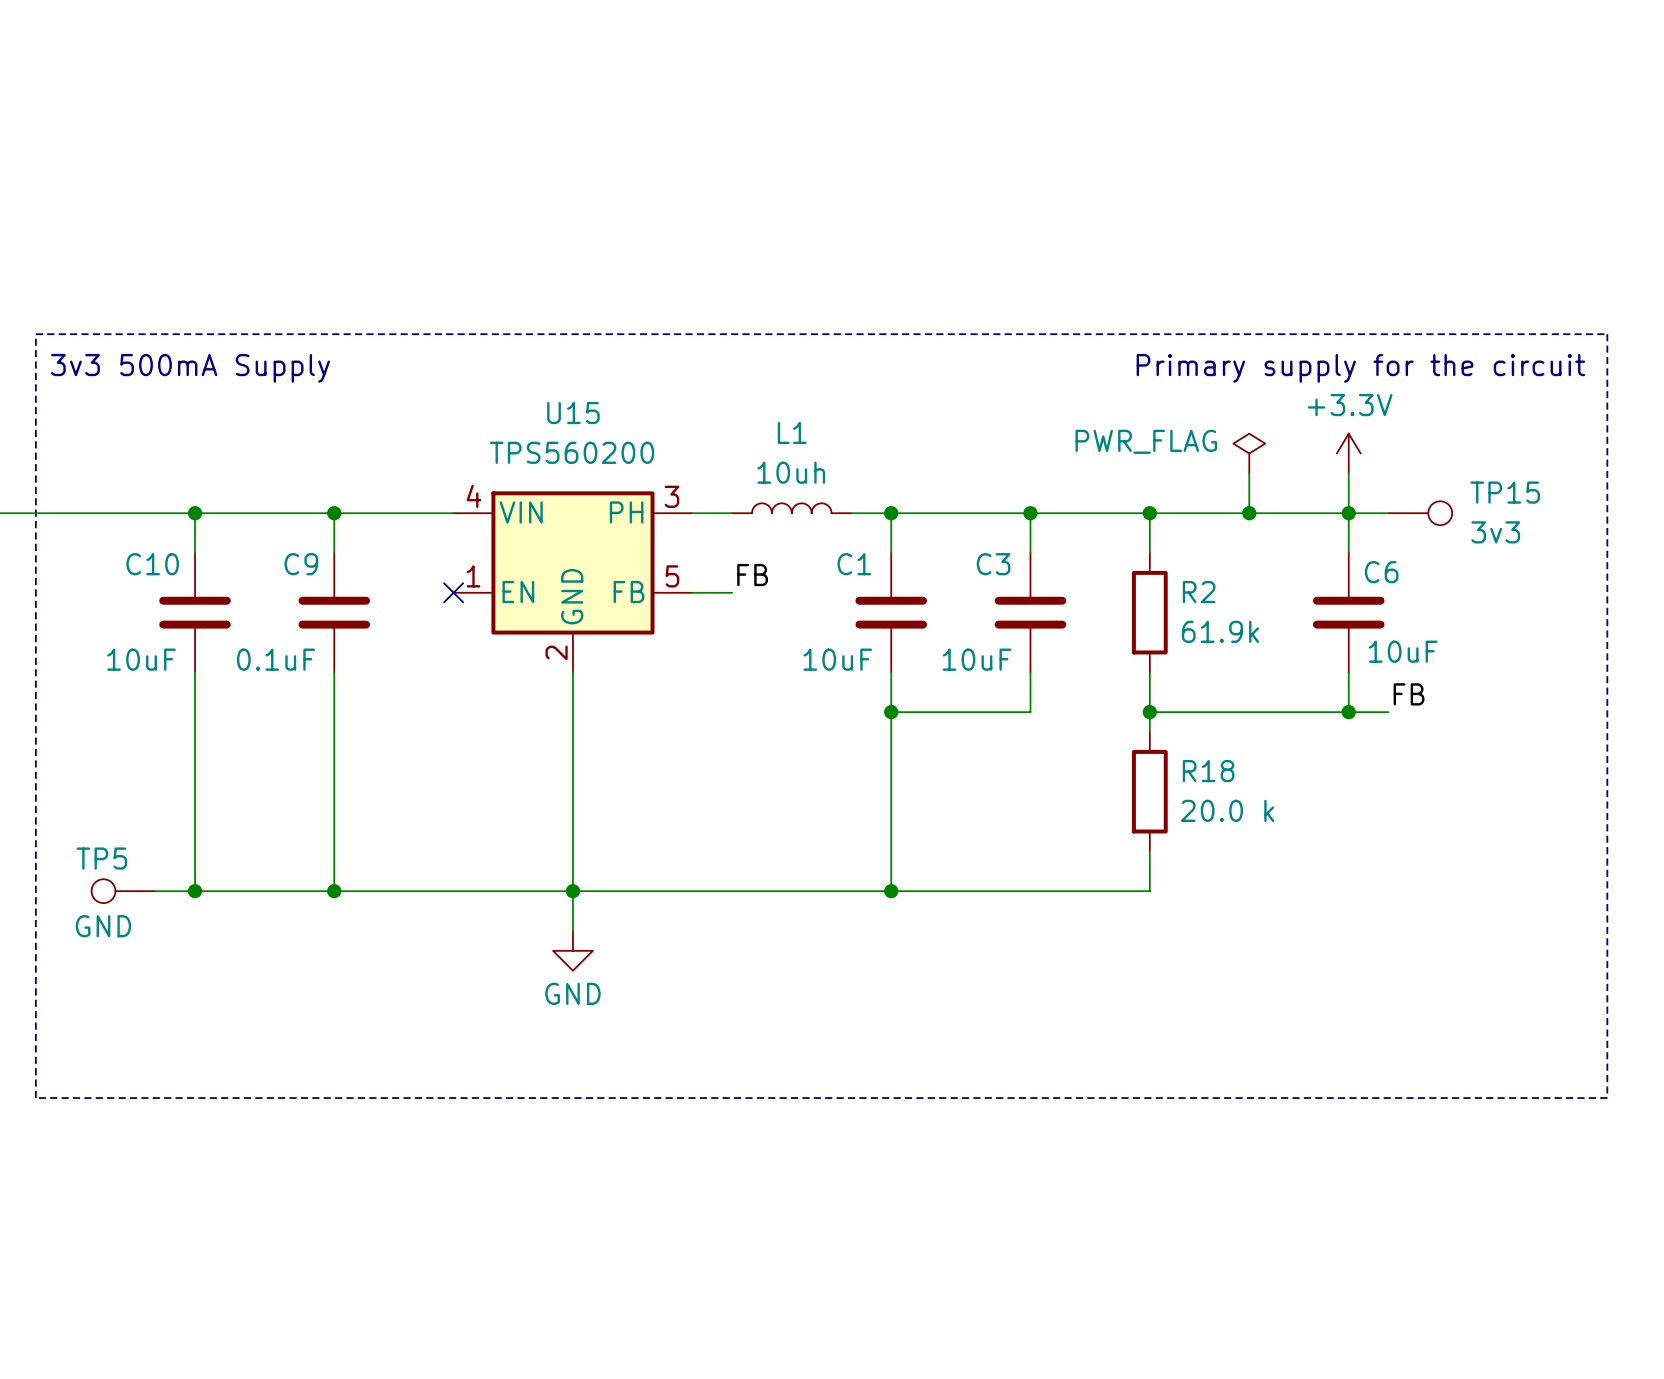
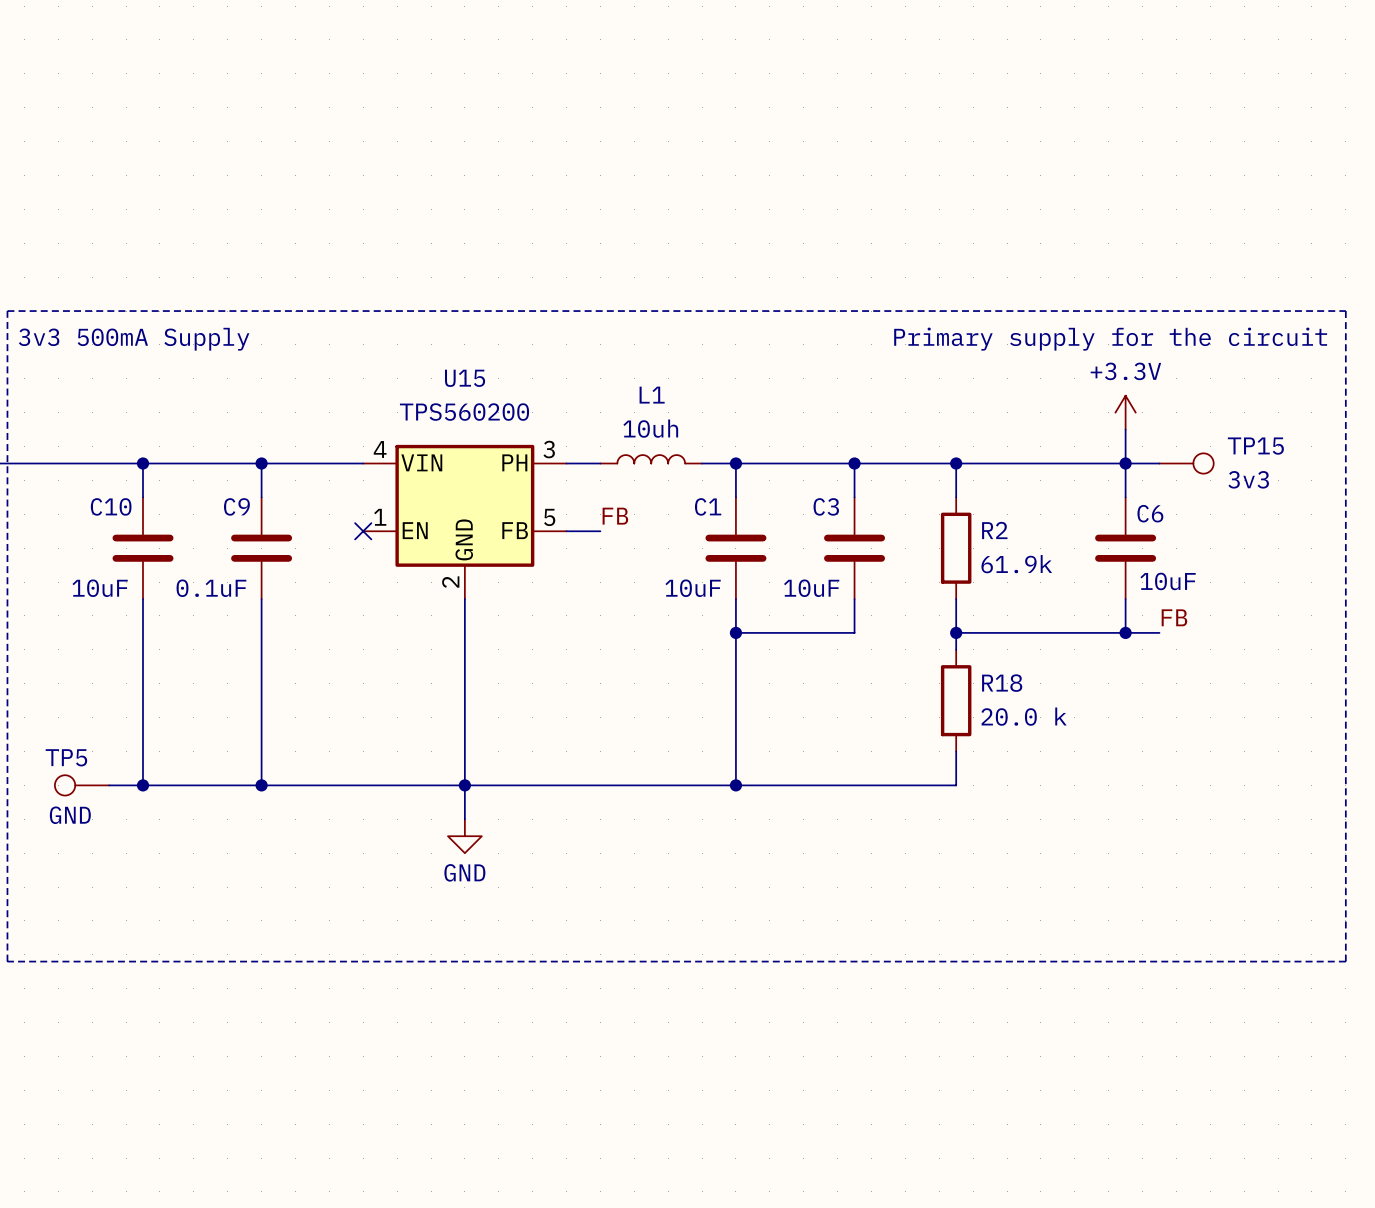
power symbol: PWR_FLAG (1249, 453) -> none
wire: (1249, 473) (1249, 513) -> none
junction: (1249, 513) -> none

